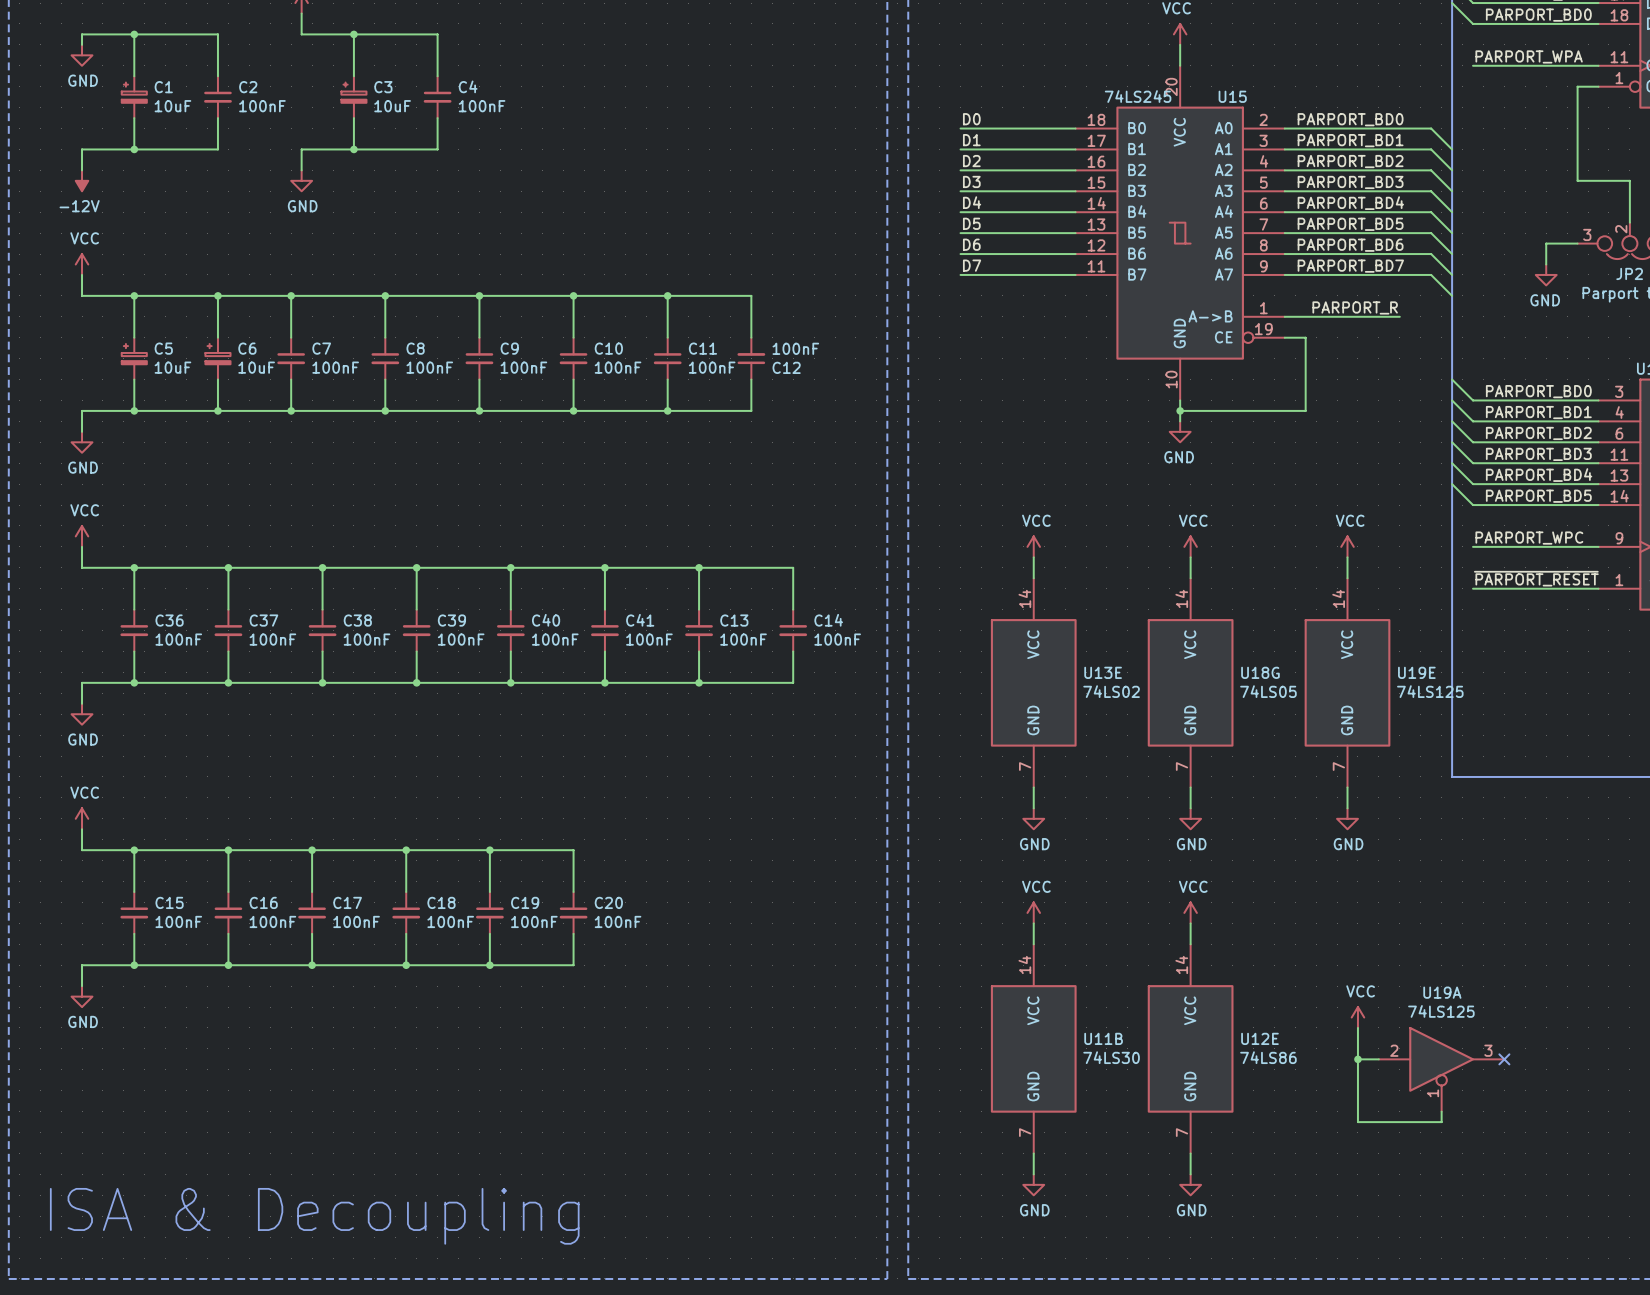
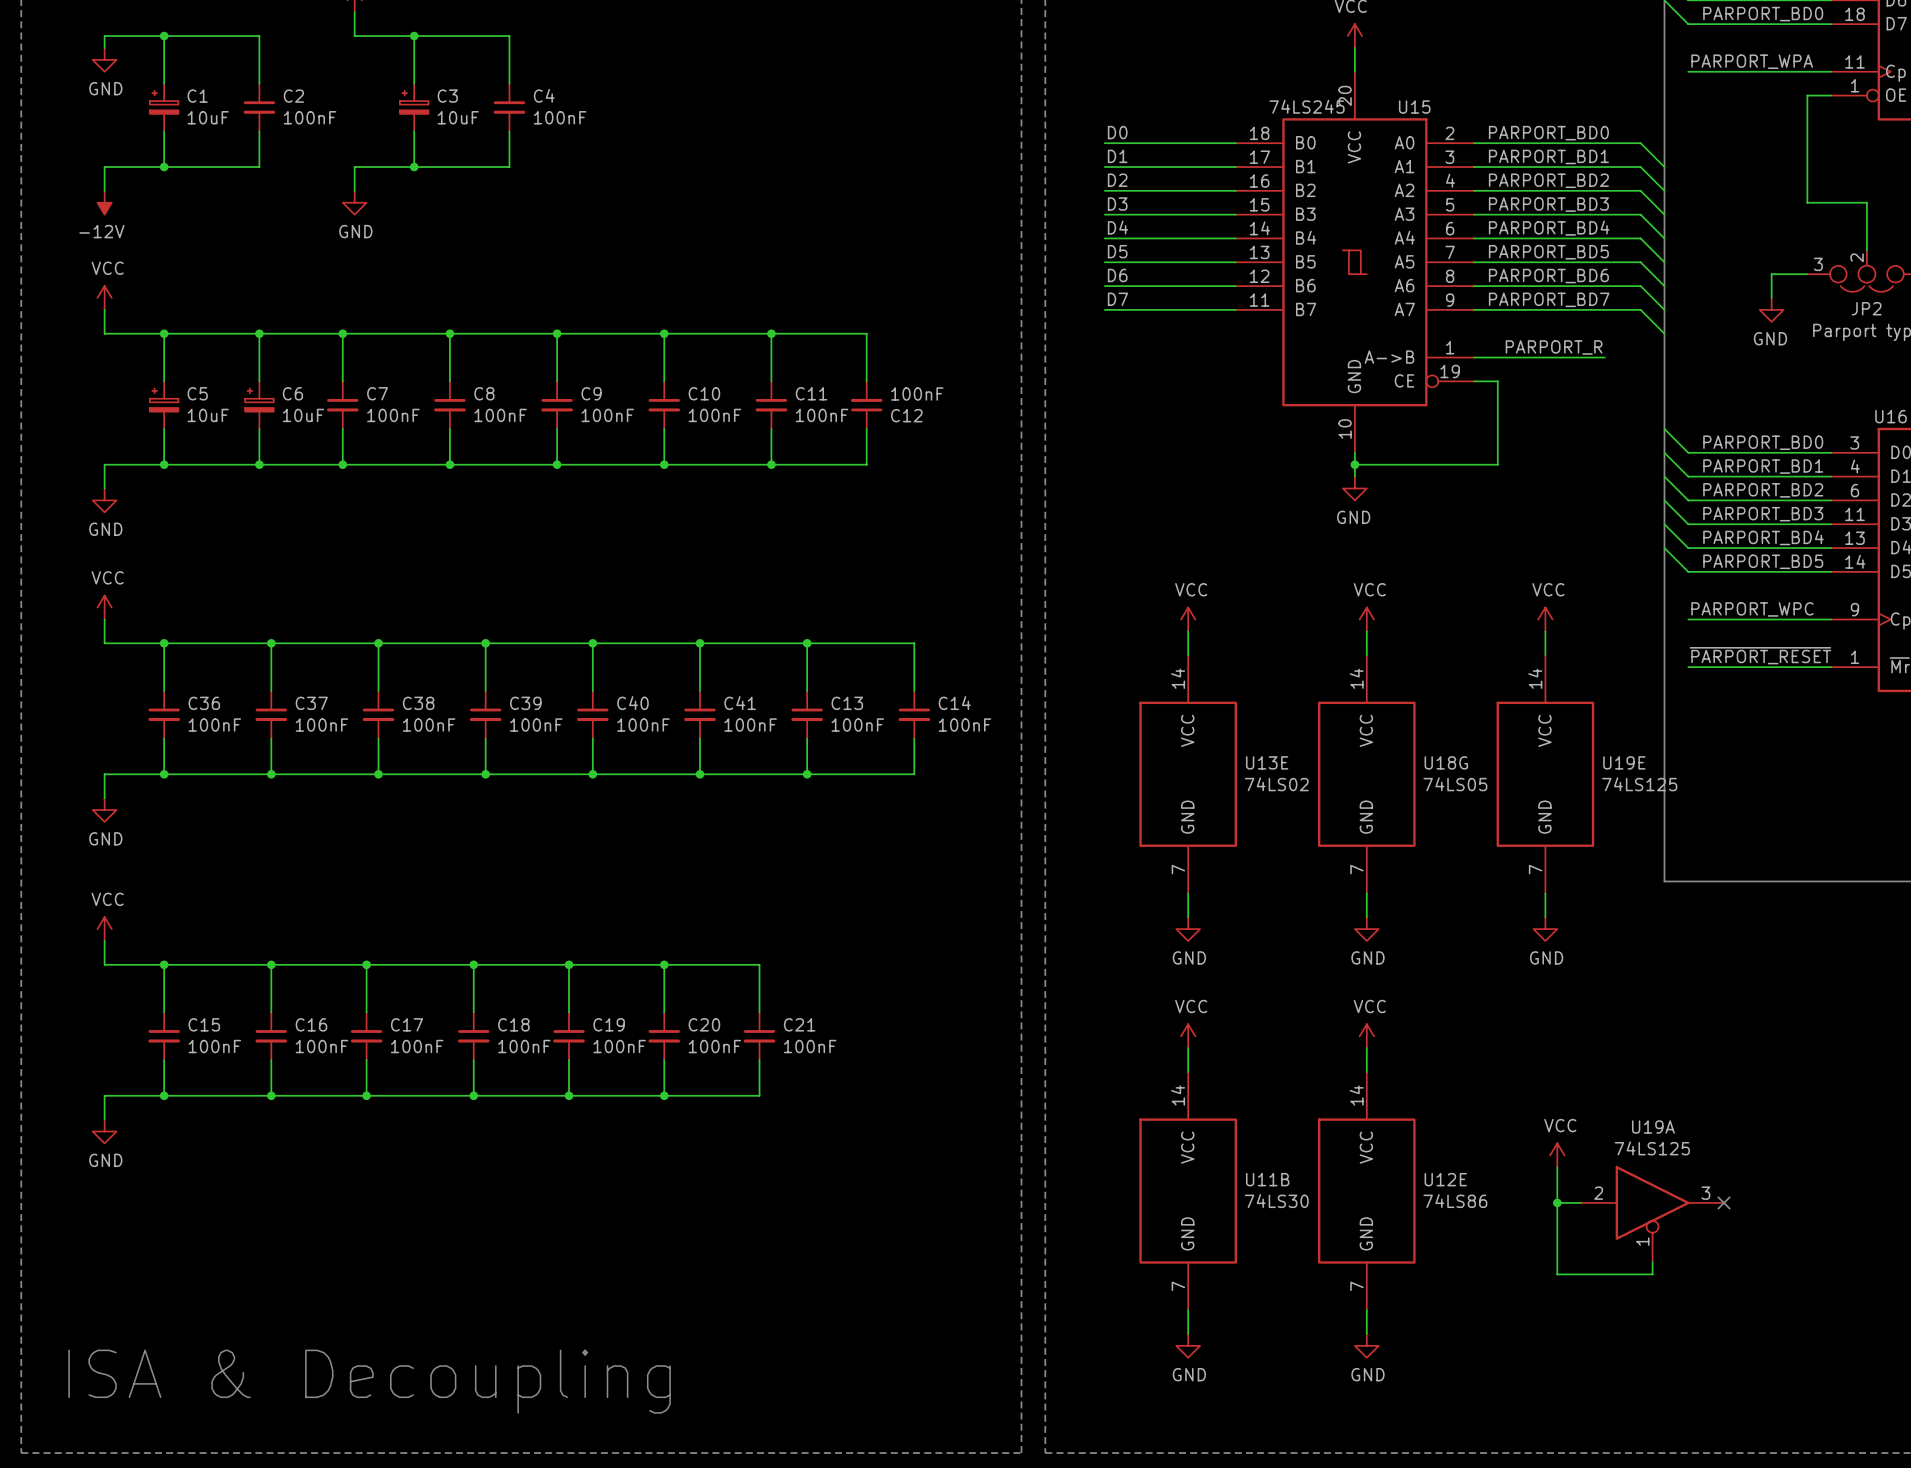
wire: none -> (664, 964) (759, 964) (759, 1012)
junction: none -> (664, 964)
C21: none -> 100nF (759, 1036)
wire: none -> (759, 1060) (759, 1095) (664, 1095)
junction: none -> (664, 1095)

